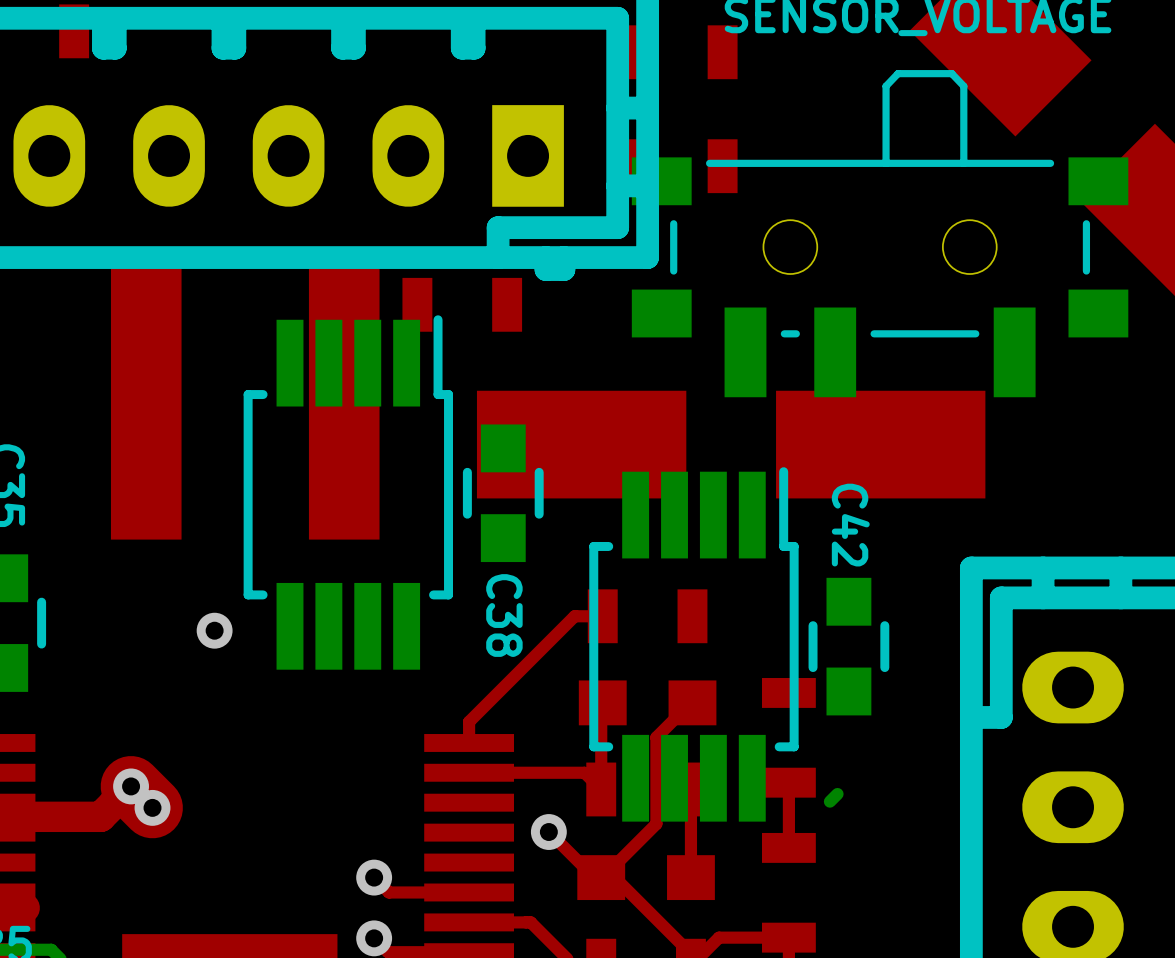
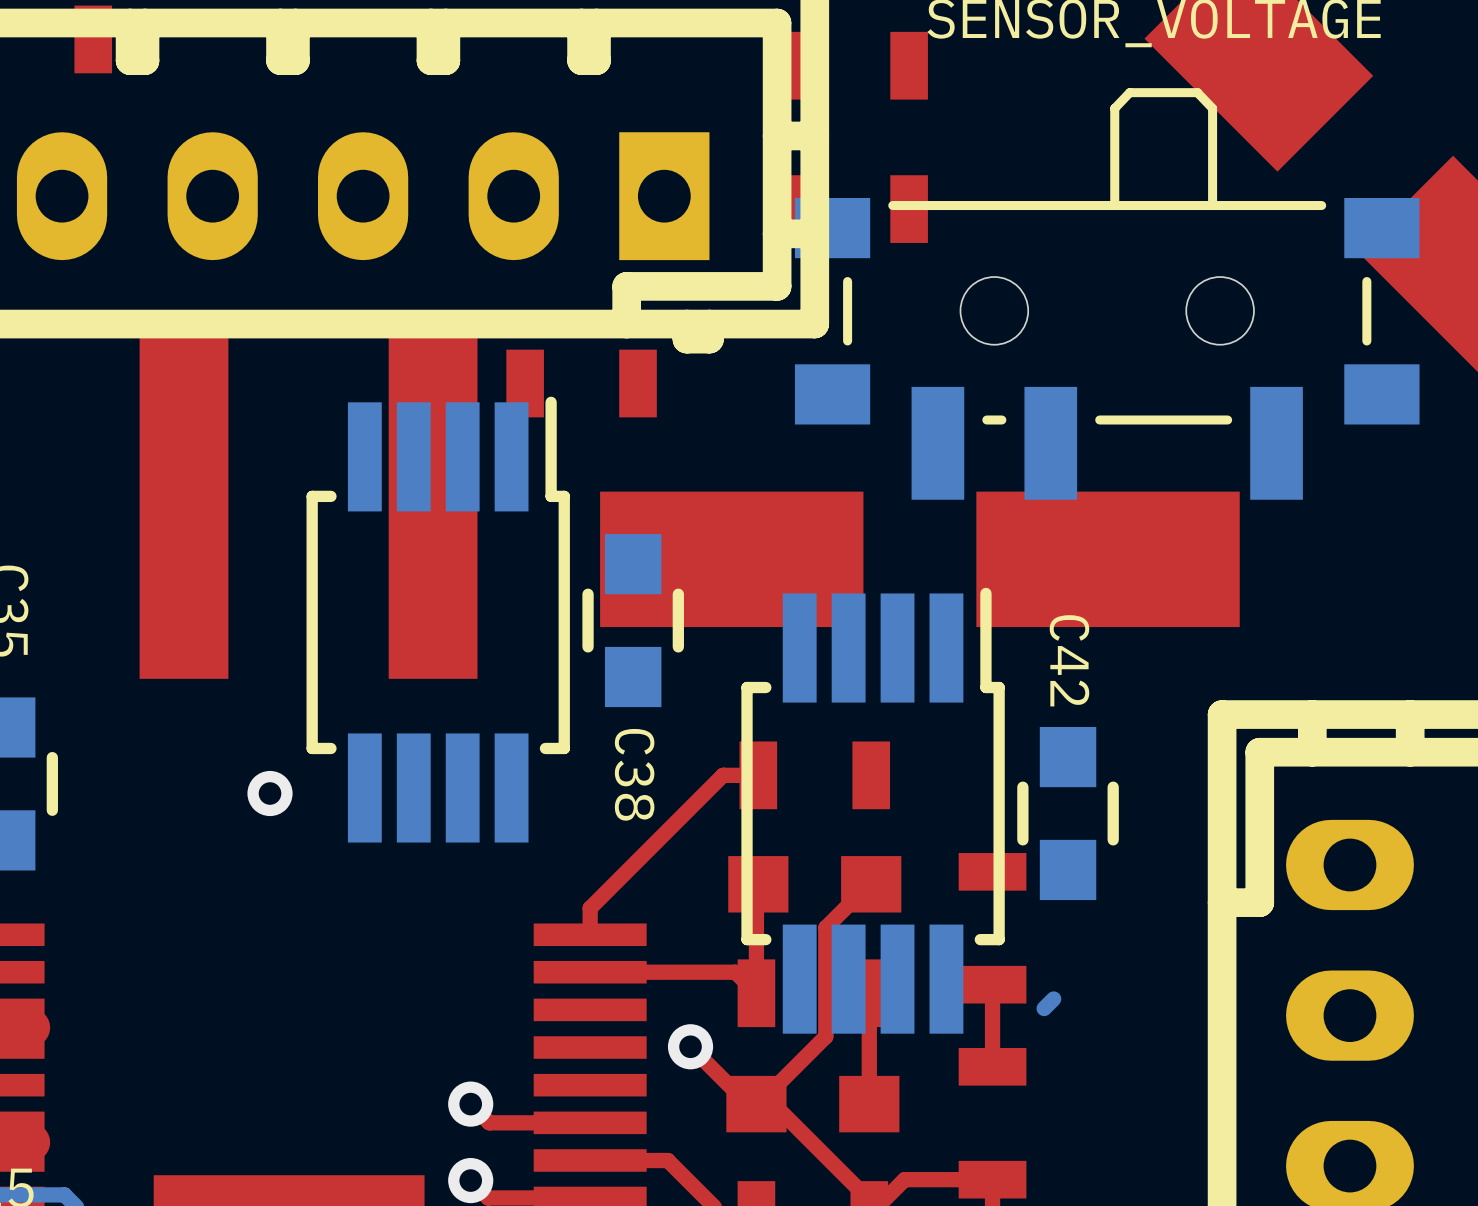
via: (131, 786) -> none
top track: (152, 807) (131, 786) (100, 816) (24, 816) -> none
via: (152, 807) -> none

